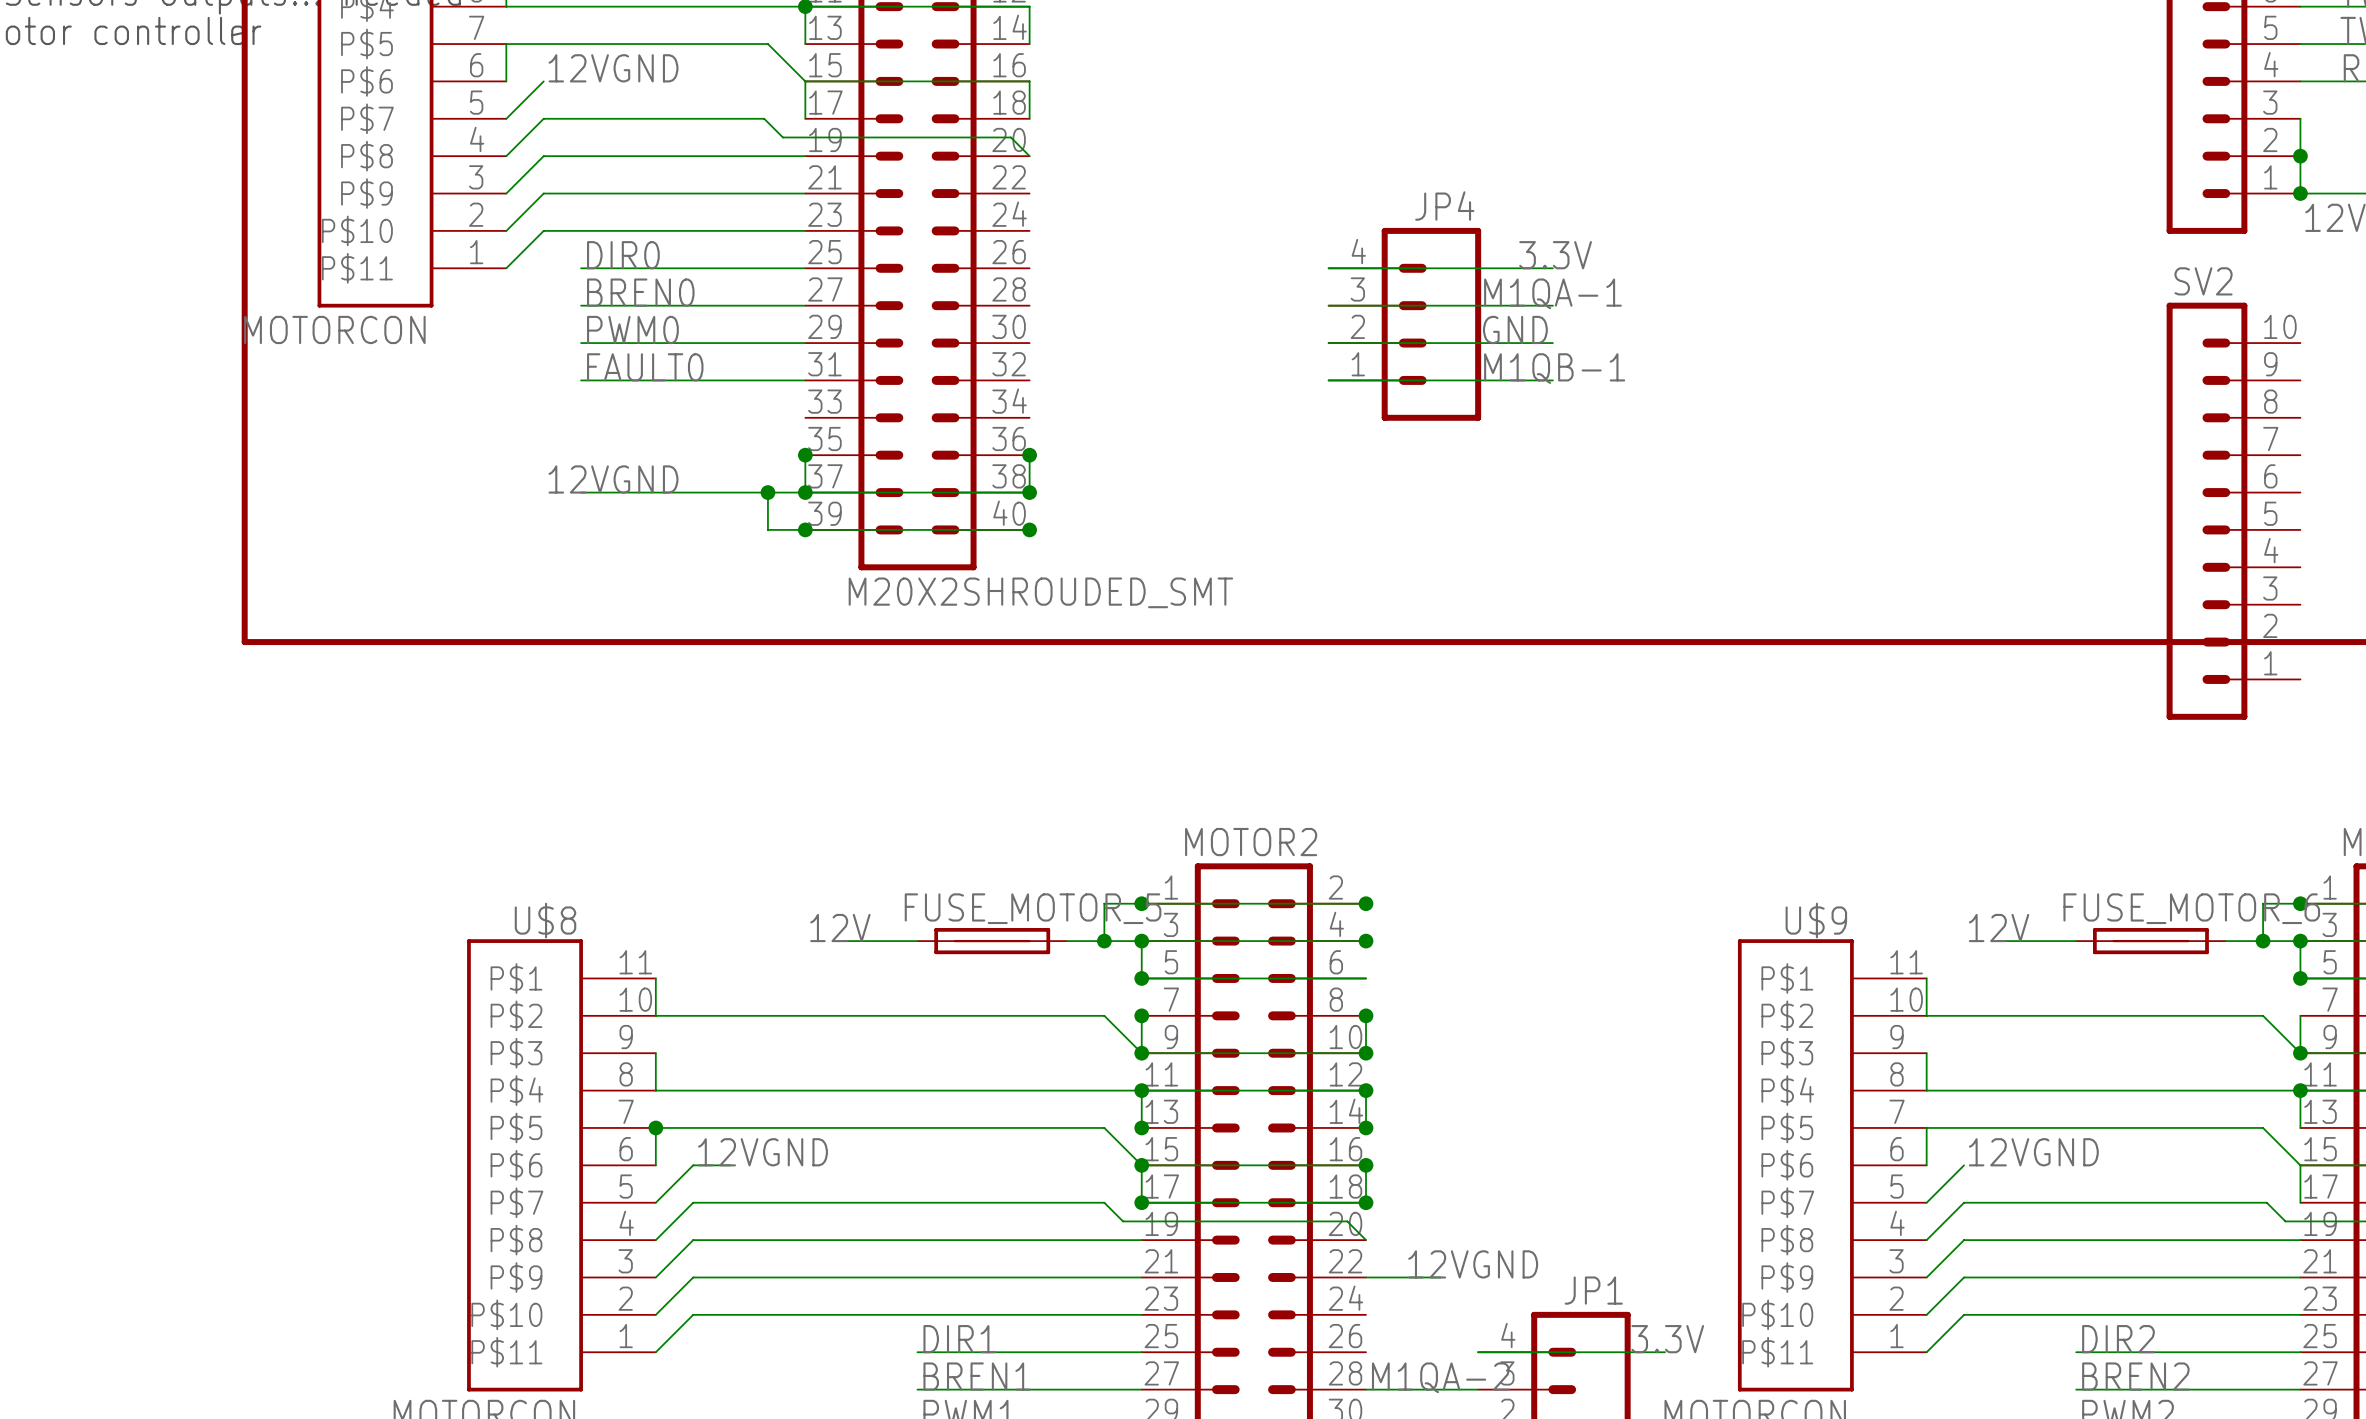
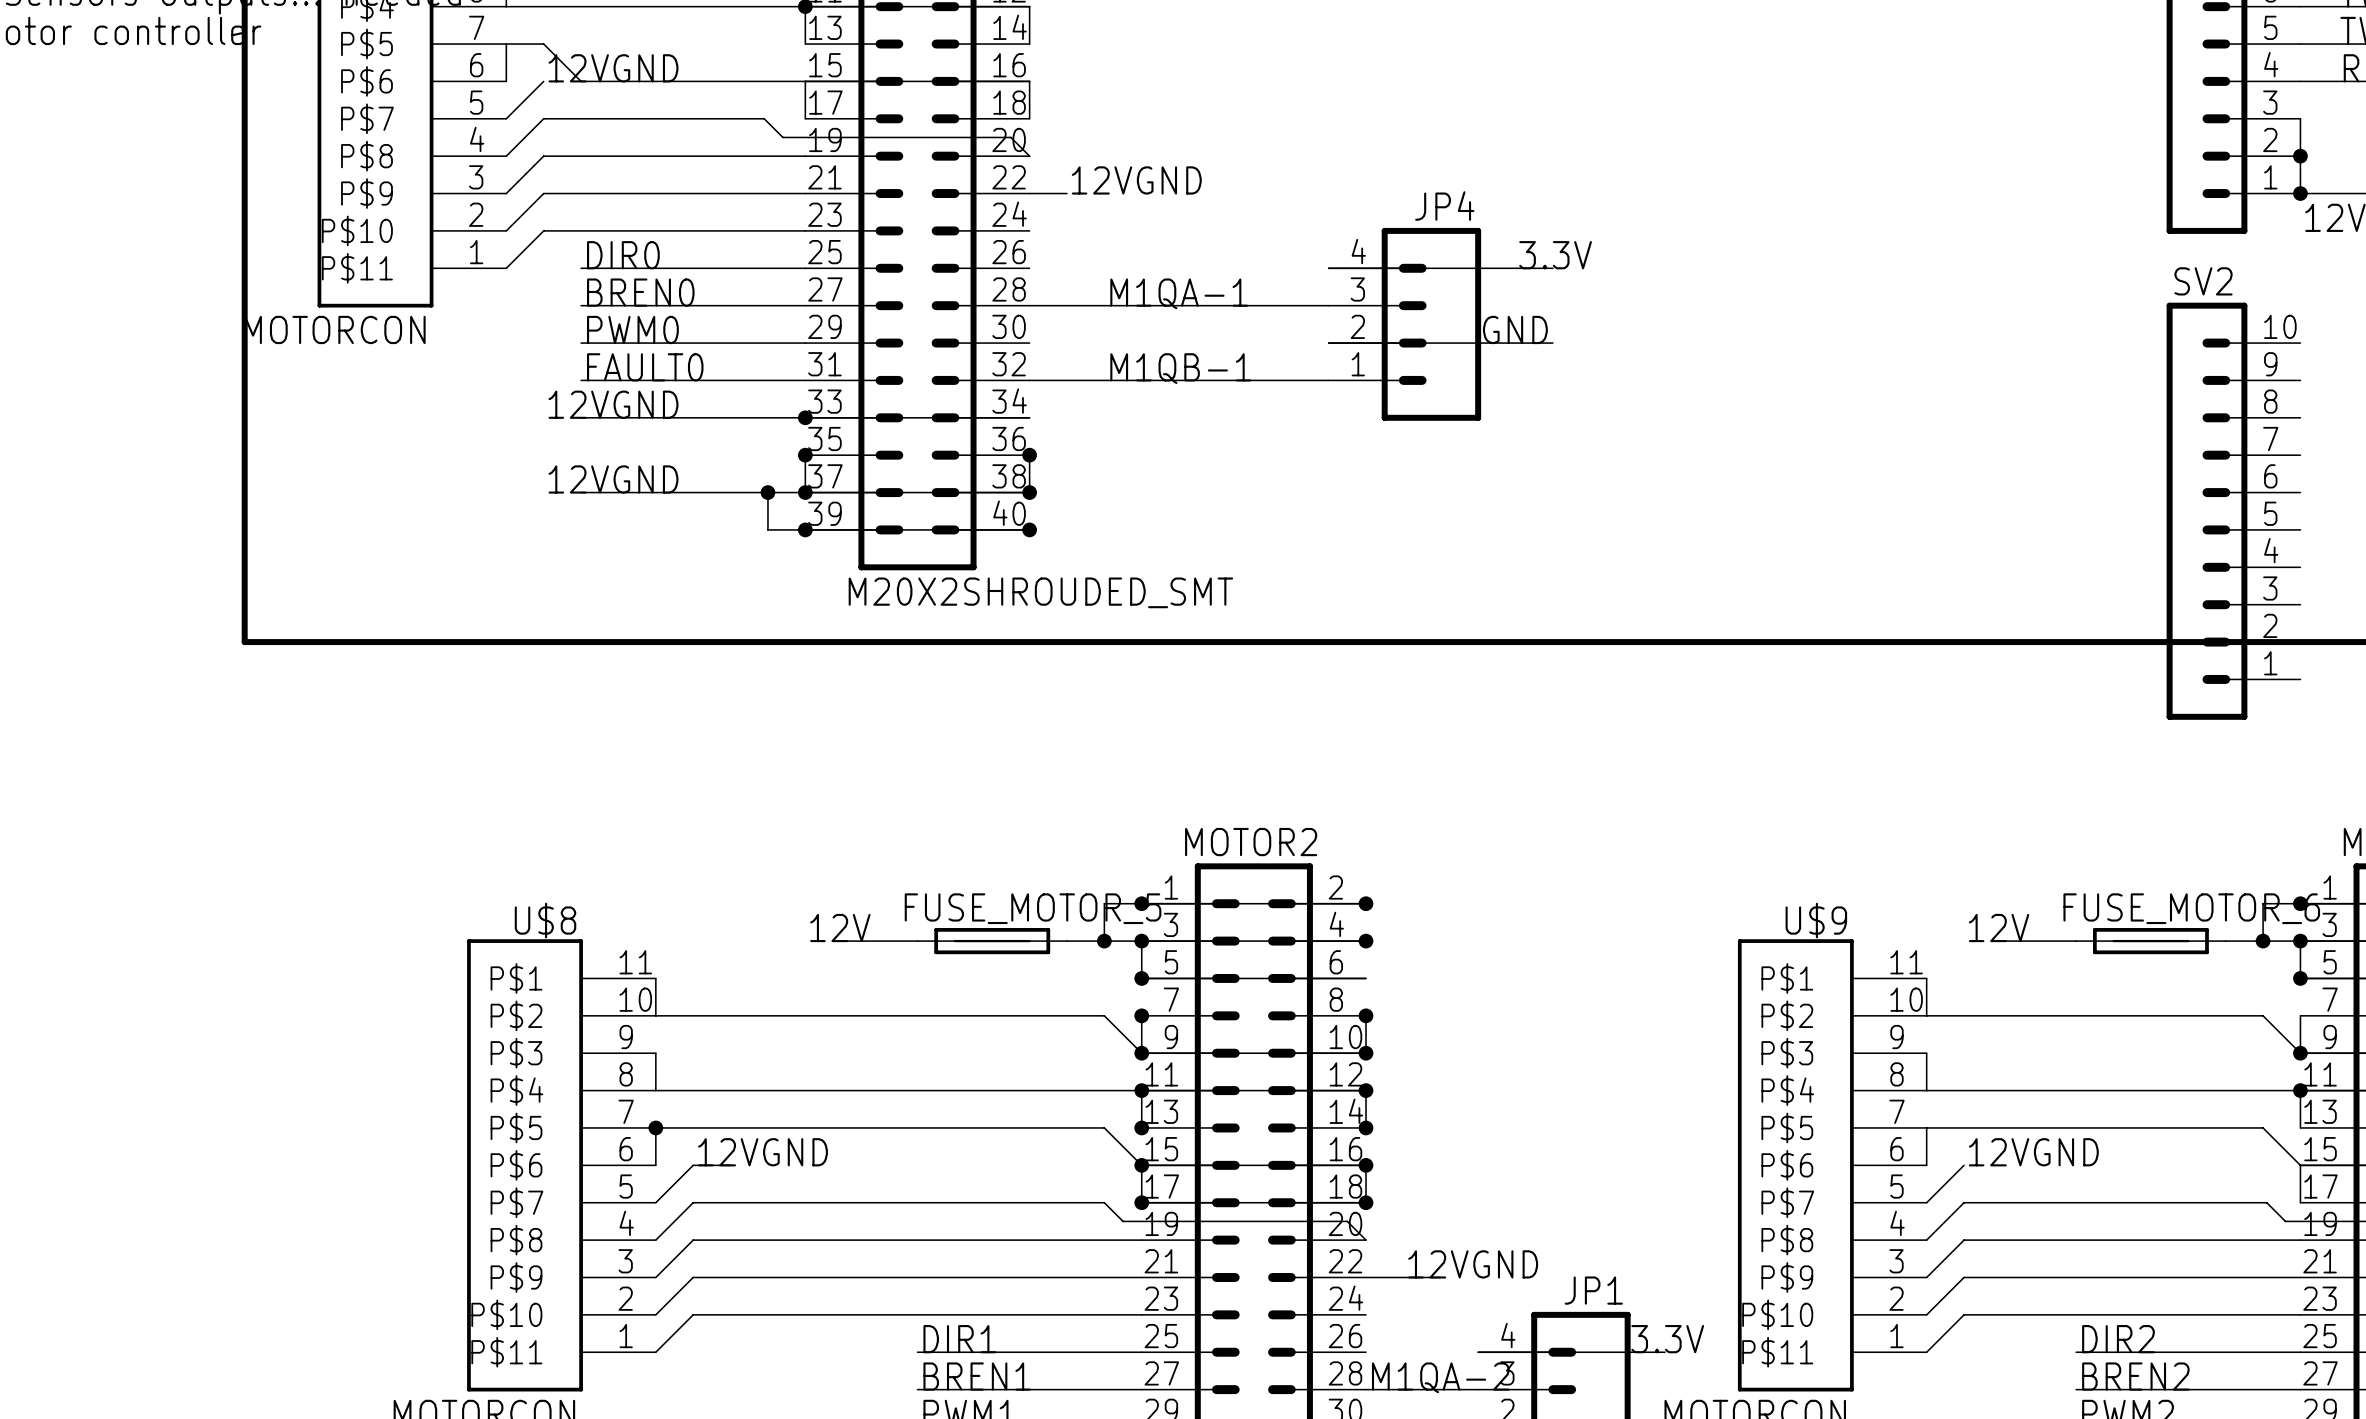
wire: (543, 44) (767, 44) (805, 81) -> (543, 44) (581, 81) (805, 81)
label: none -> 12VGND (1136, 180)
wire: none -> (1029, 193) (1066, 193)
label: none -> M1QA-1 (1179, 293)
label: M1QA-1 (1552, 293) -> none
wire: (1328, 305) (1552, 305) -> (1328, 305) (1029, 305)
label: none -> M1QB-1 (1180, 368)
label: M1QB-1 (1554, 368) -> none
wire: (1328, 380) (1552, 380) -> (1328, 380) (1029, 380)
label: none -> 12VGND (613, 404)
wire: none -> (581, 417) (1029, 417)
junction: none -> (805, 417)

